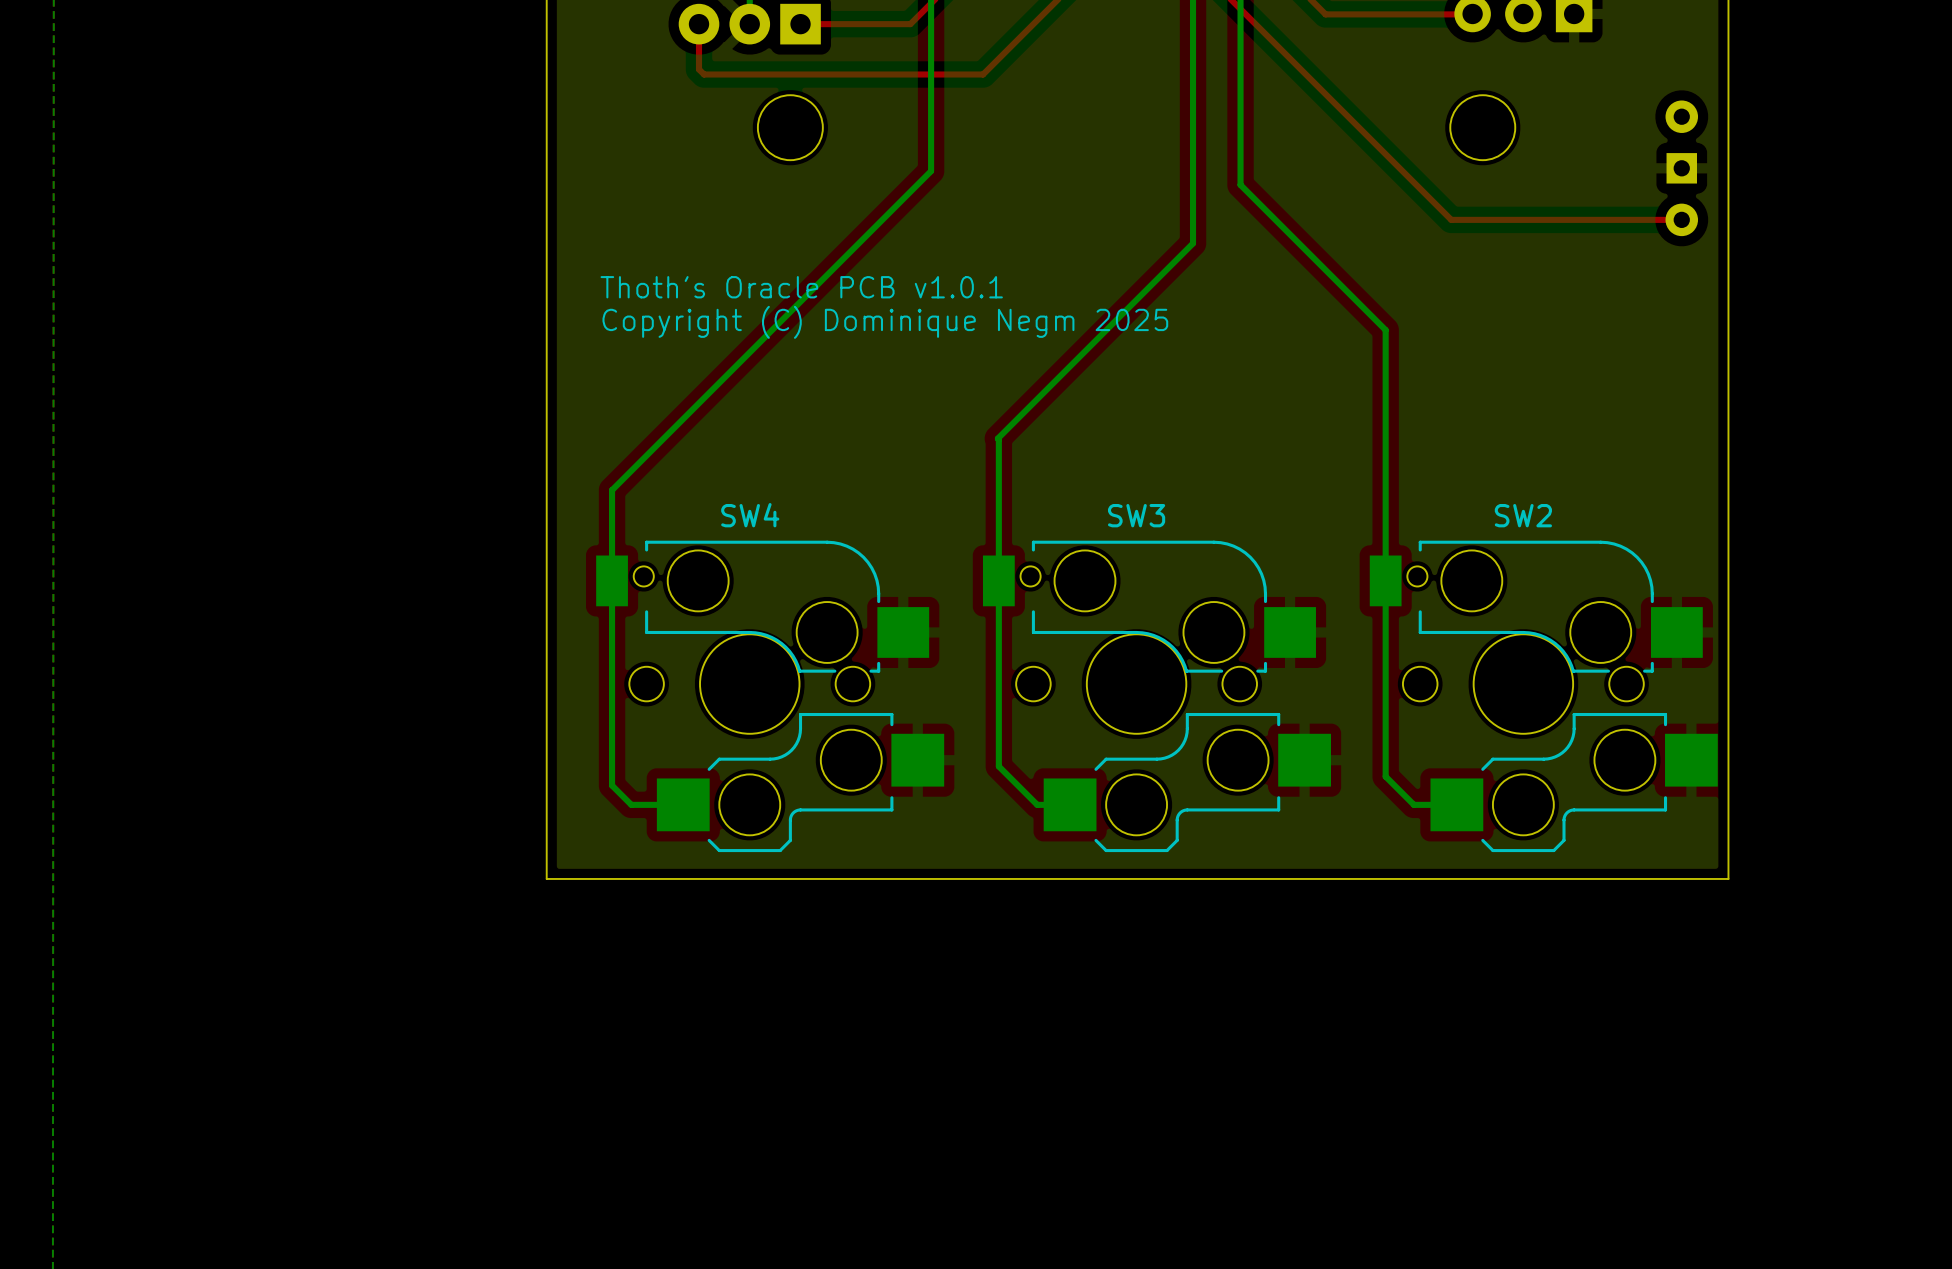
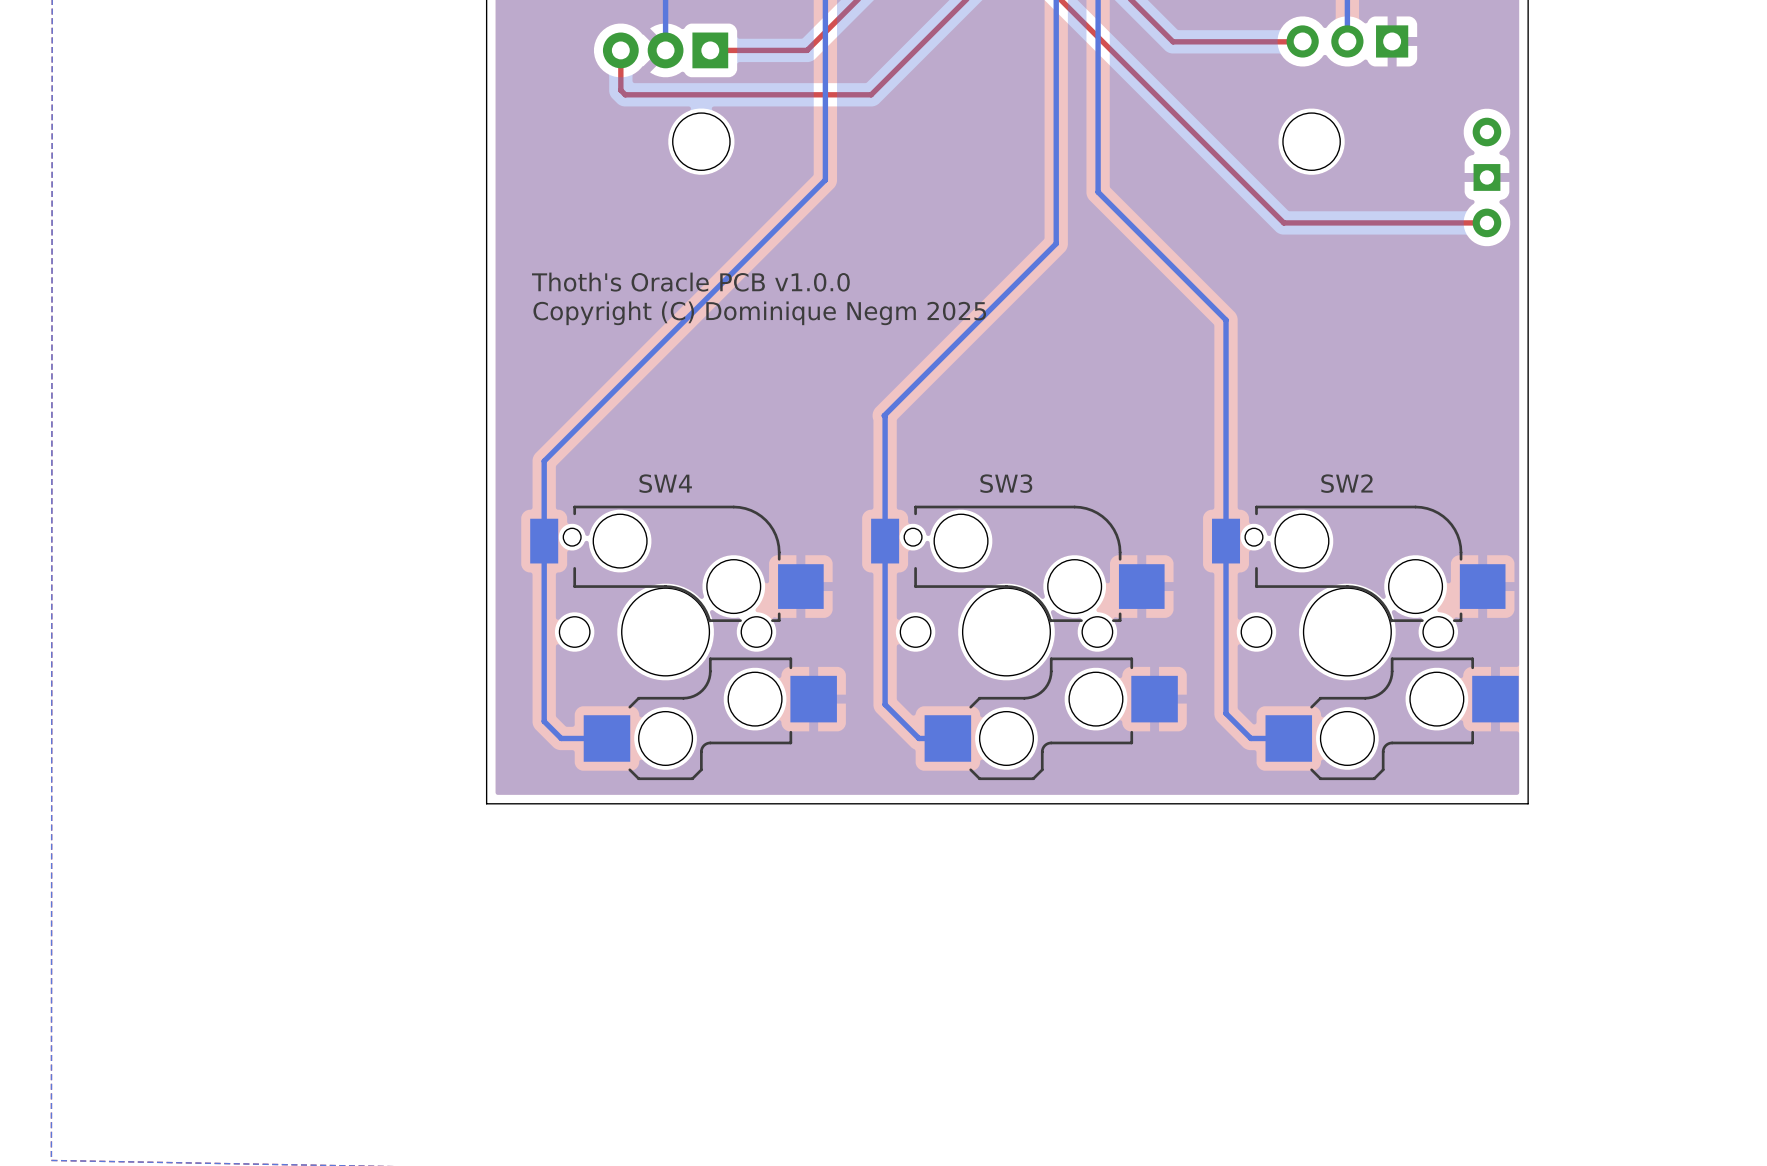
text: Thoth's Oracle PCB v1.0.1 (801, 287) -> Thoth's Oracle PCB v1.0.0 (690, 282)

